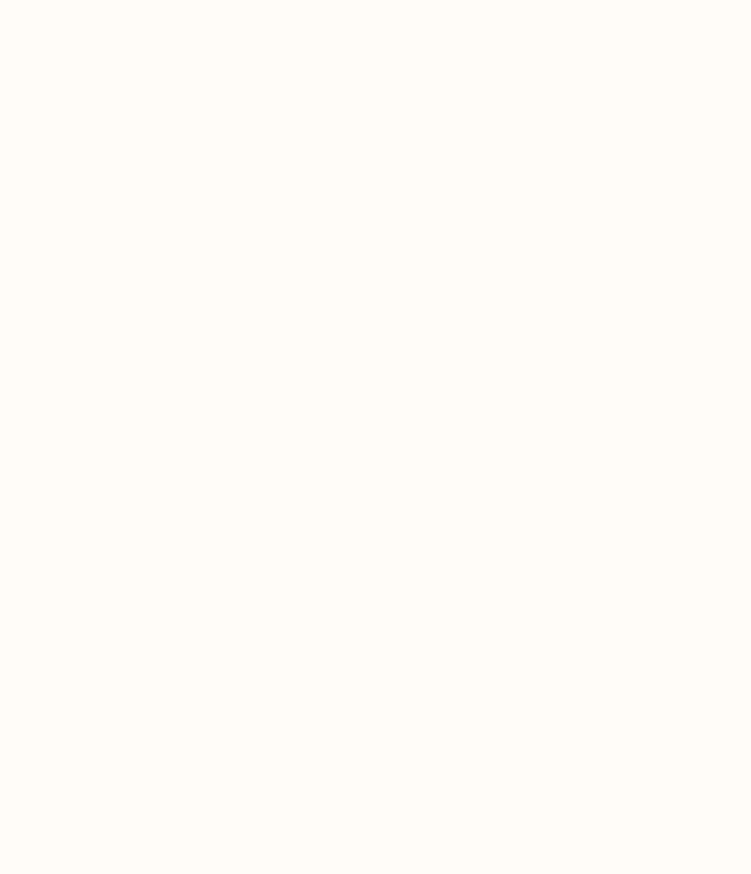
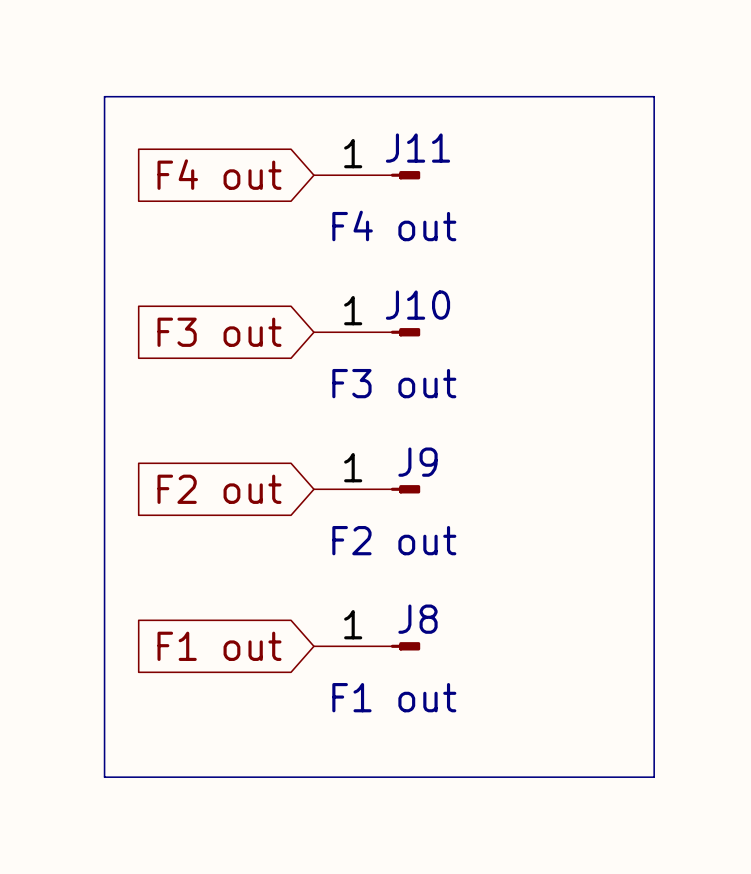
line: none -> (104, 96) (654, 96) (654, 777) (104, 777) (104, 96)
global label: none -> F4 out (219, 174)
J11: none -> F4 out (367, 175)
global label: none -> F3 out (219, 332)
J10: none -> F3 out (367, 332)
global label: none -> F2 out (219, 489)
J9: none -> F2 out (367, 489)
global label: none -> F1 out (219, 646)
J8: none -> F1 out (367, 646)

